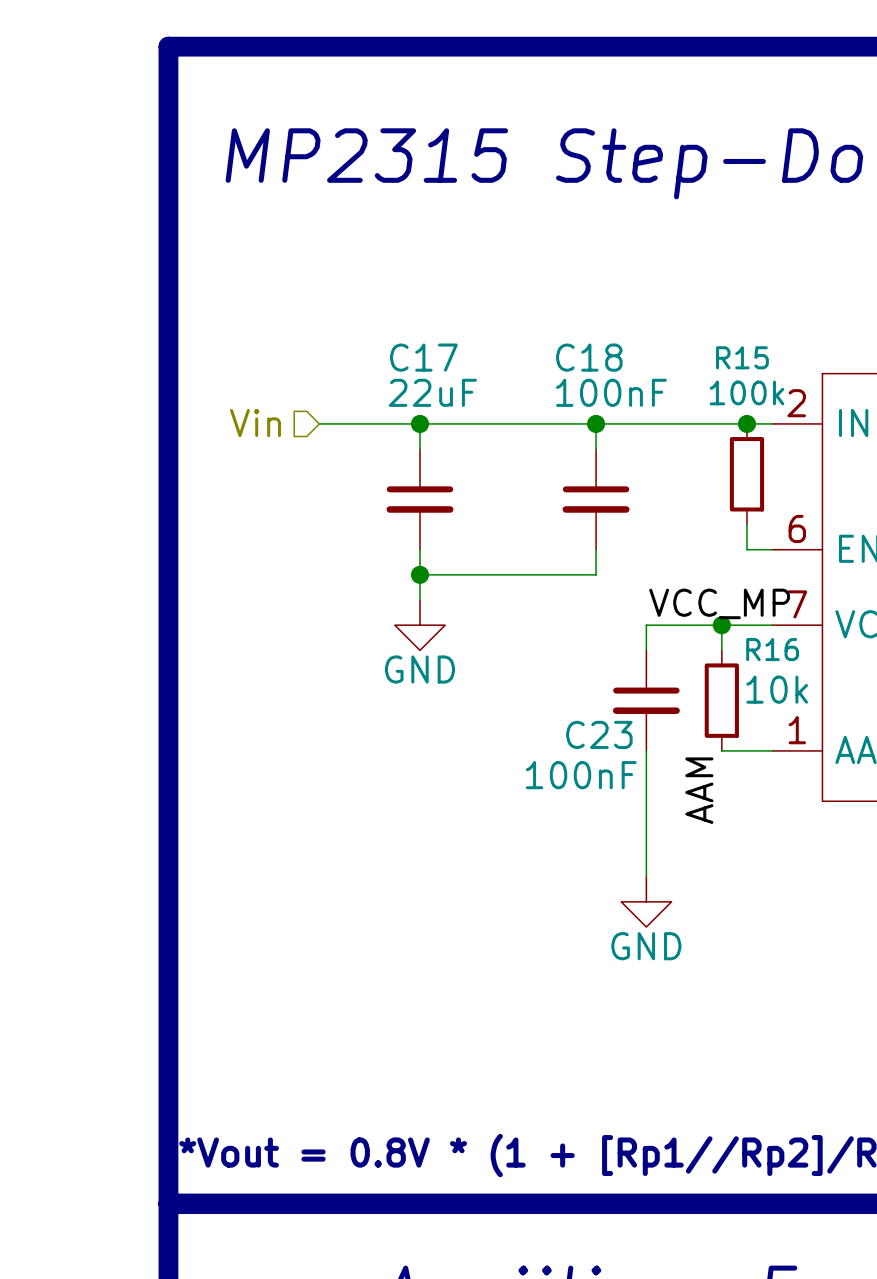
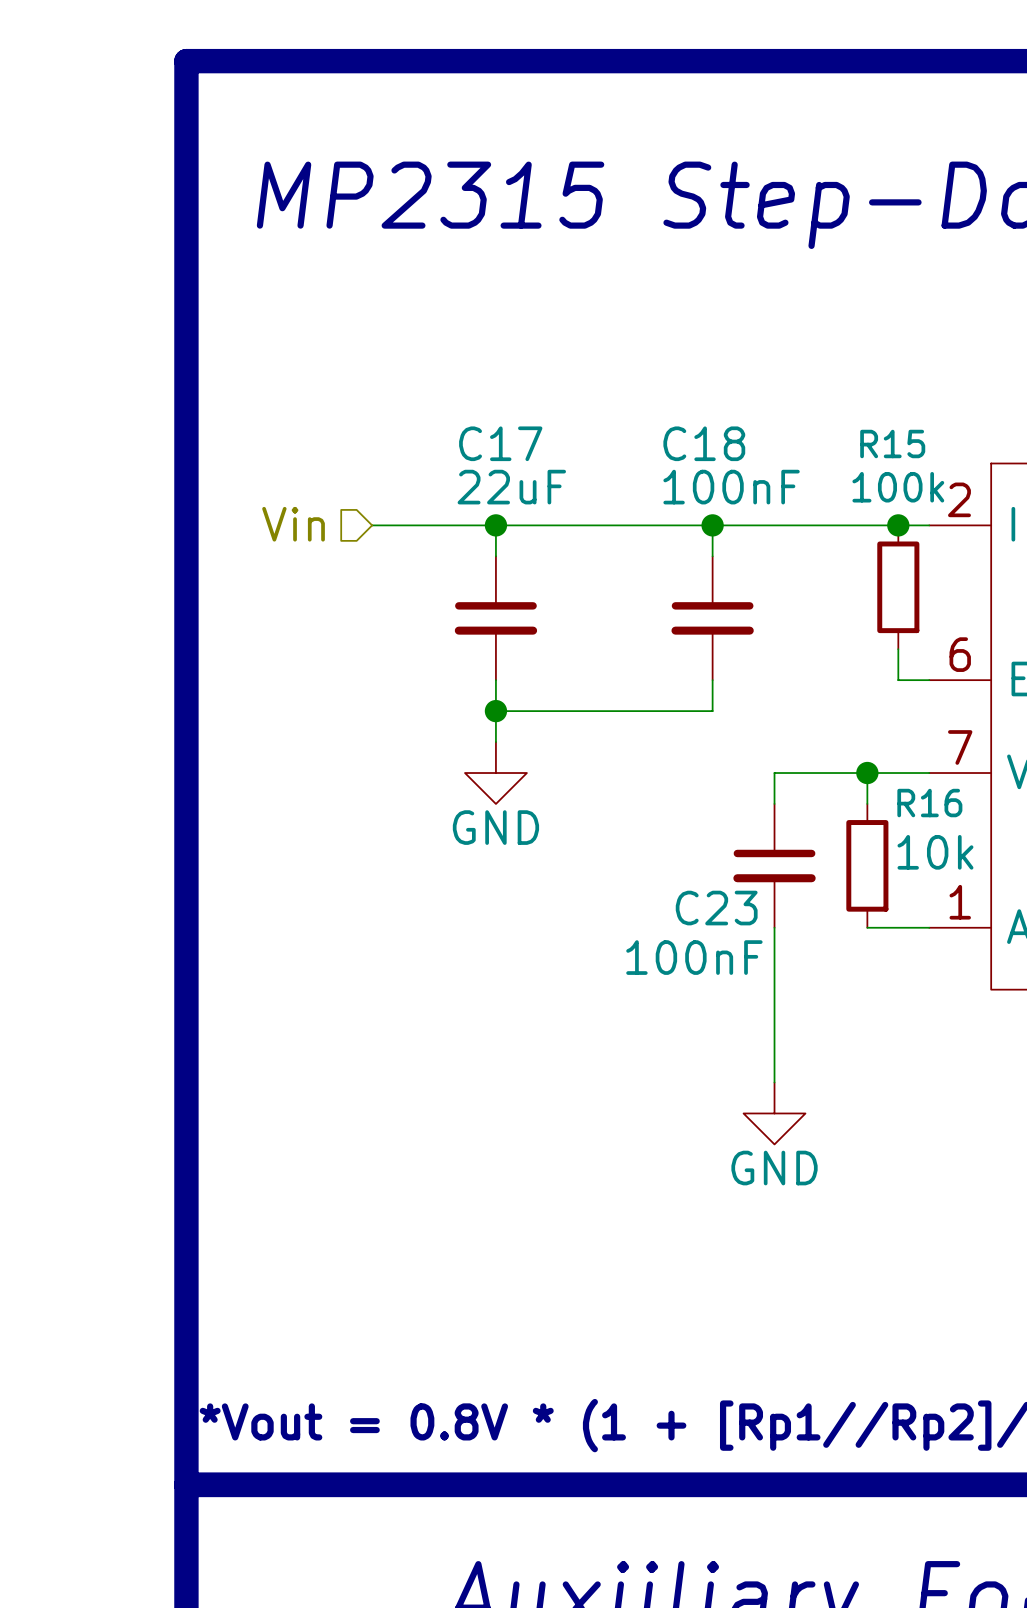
label: VCC_MP (719, 603) -> none
label: AAM (699, 790) -> none

